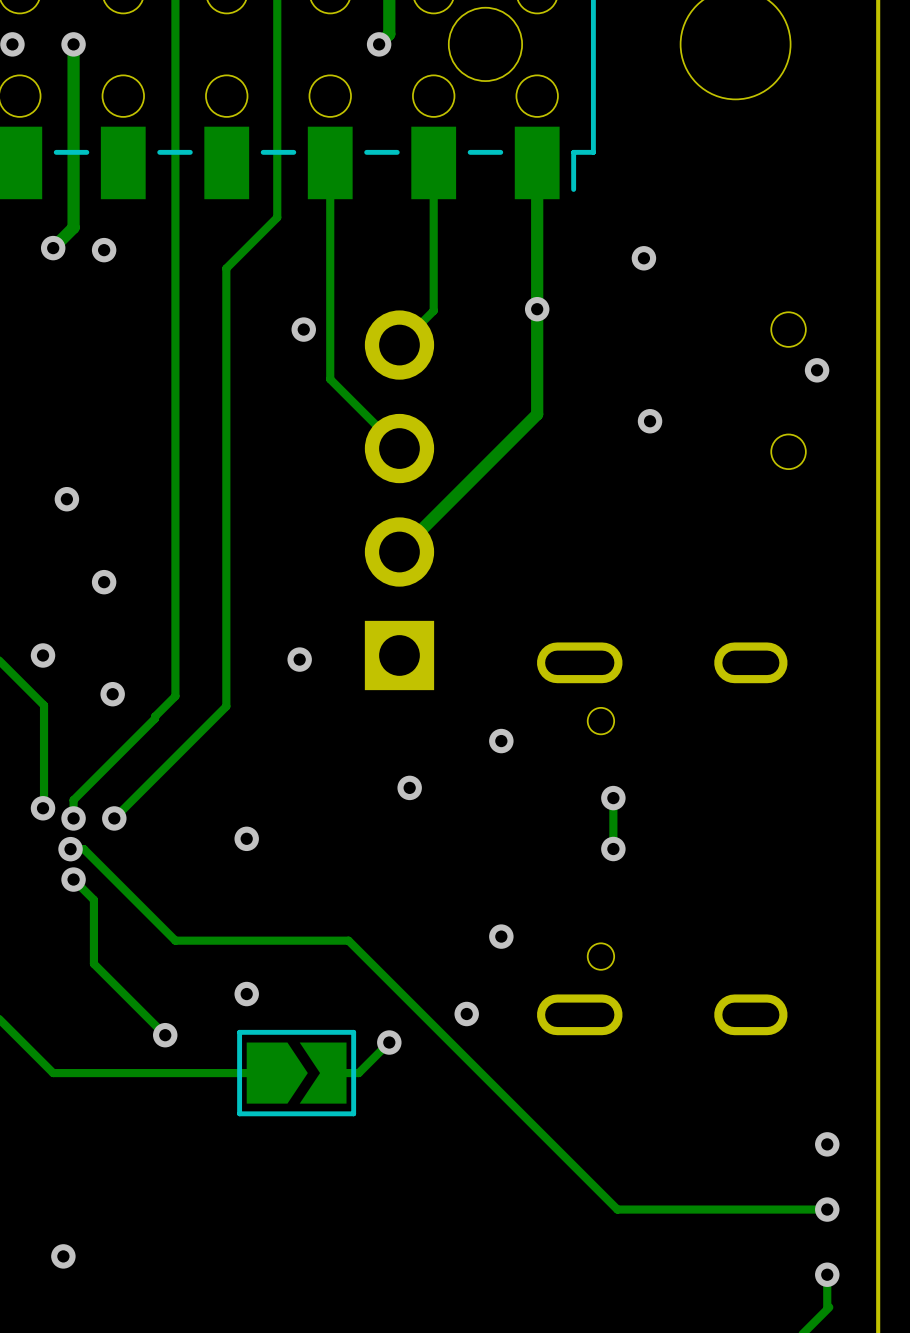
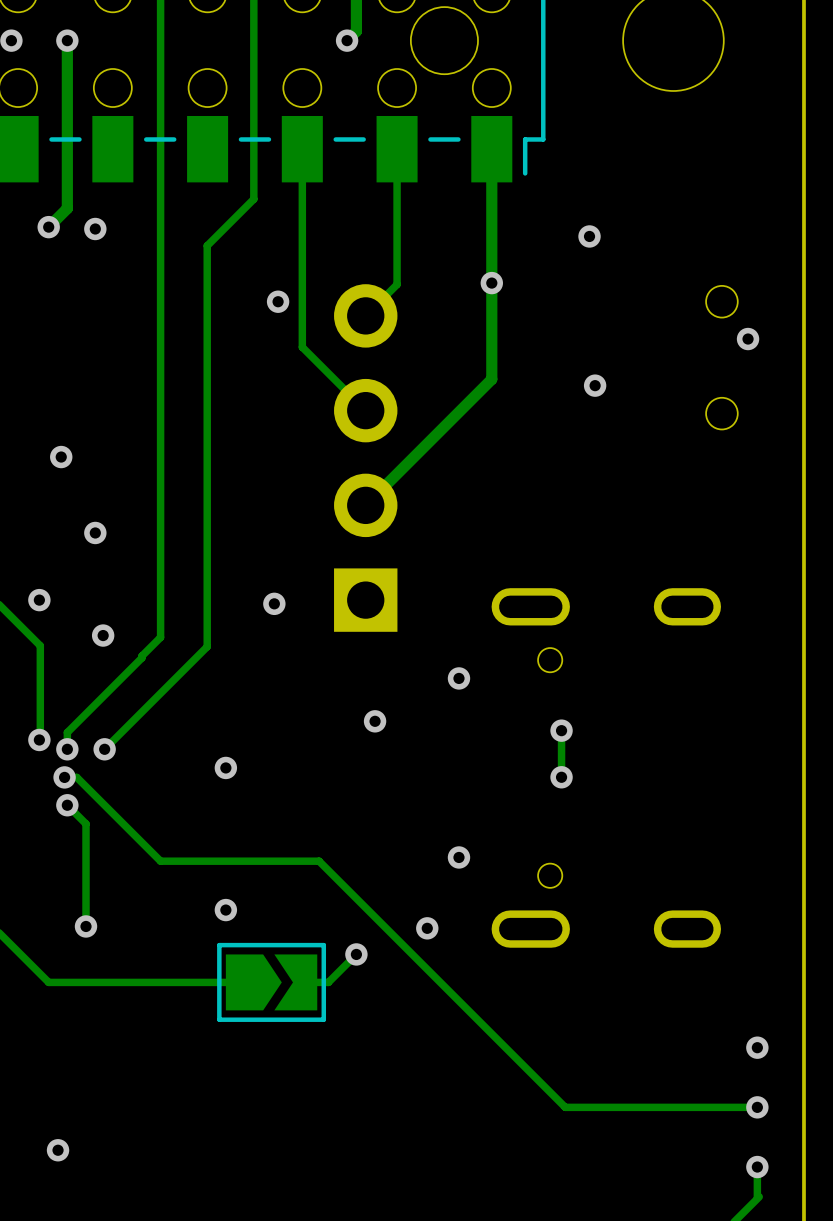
track: (93, 963) (165, 1035) -> (86, 882) (86, 926)
via position: (165, 1035) -> (86, 926)

